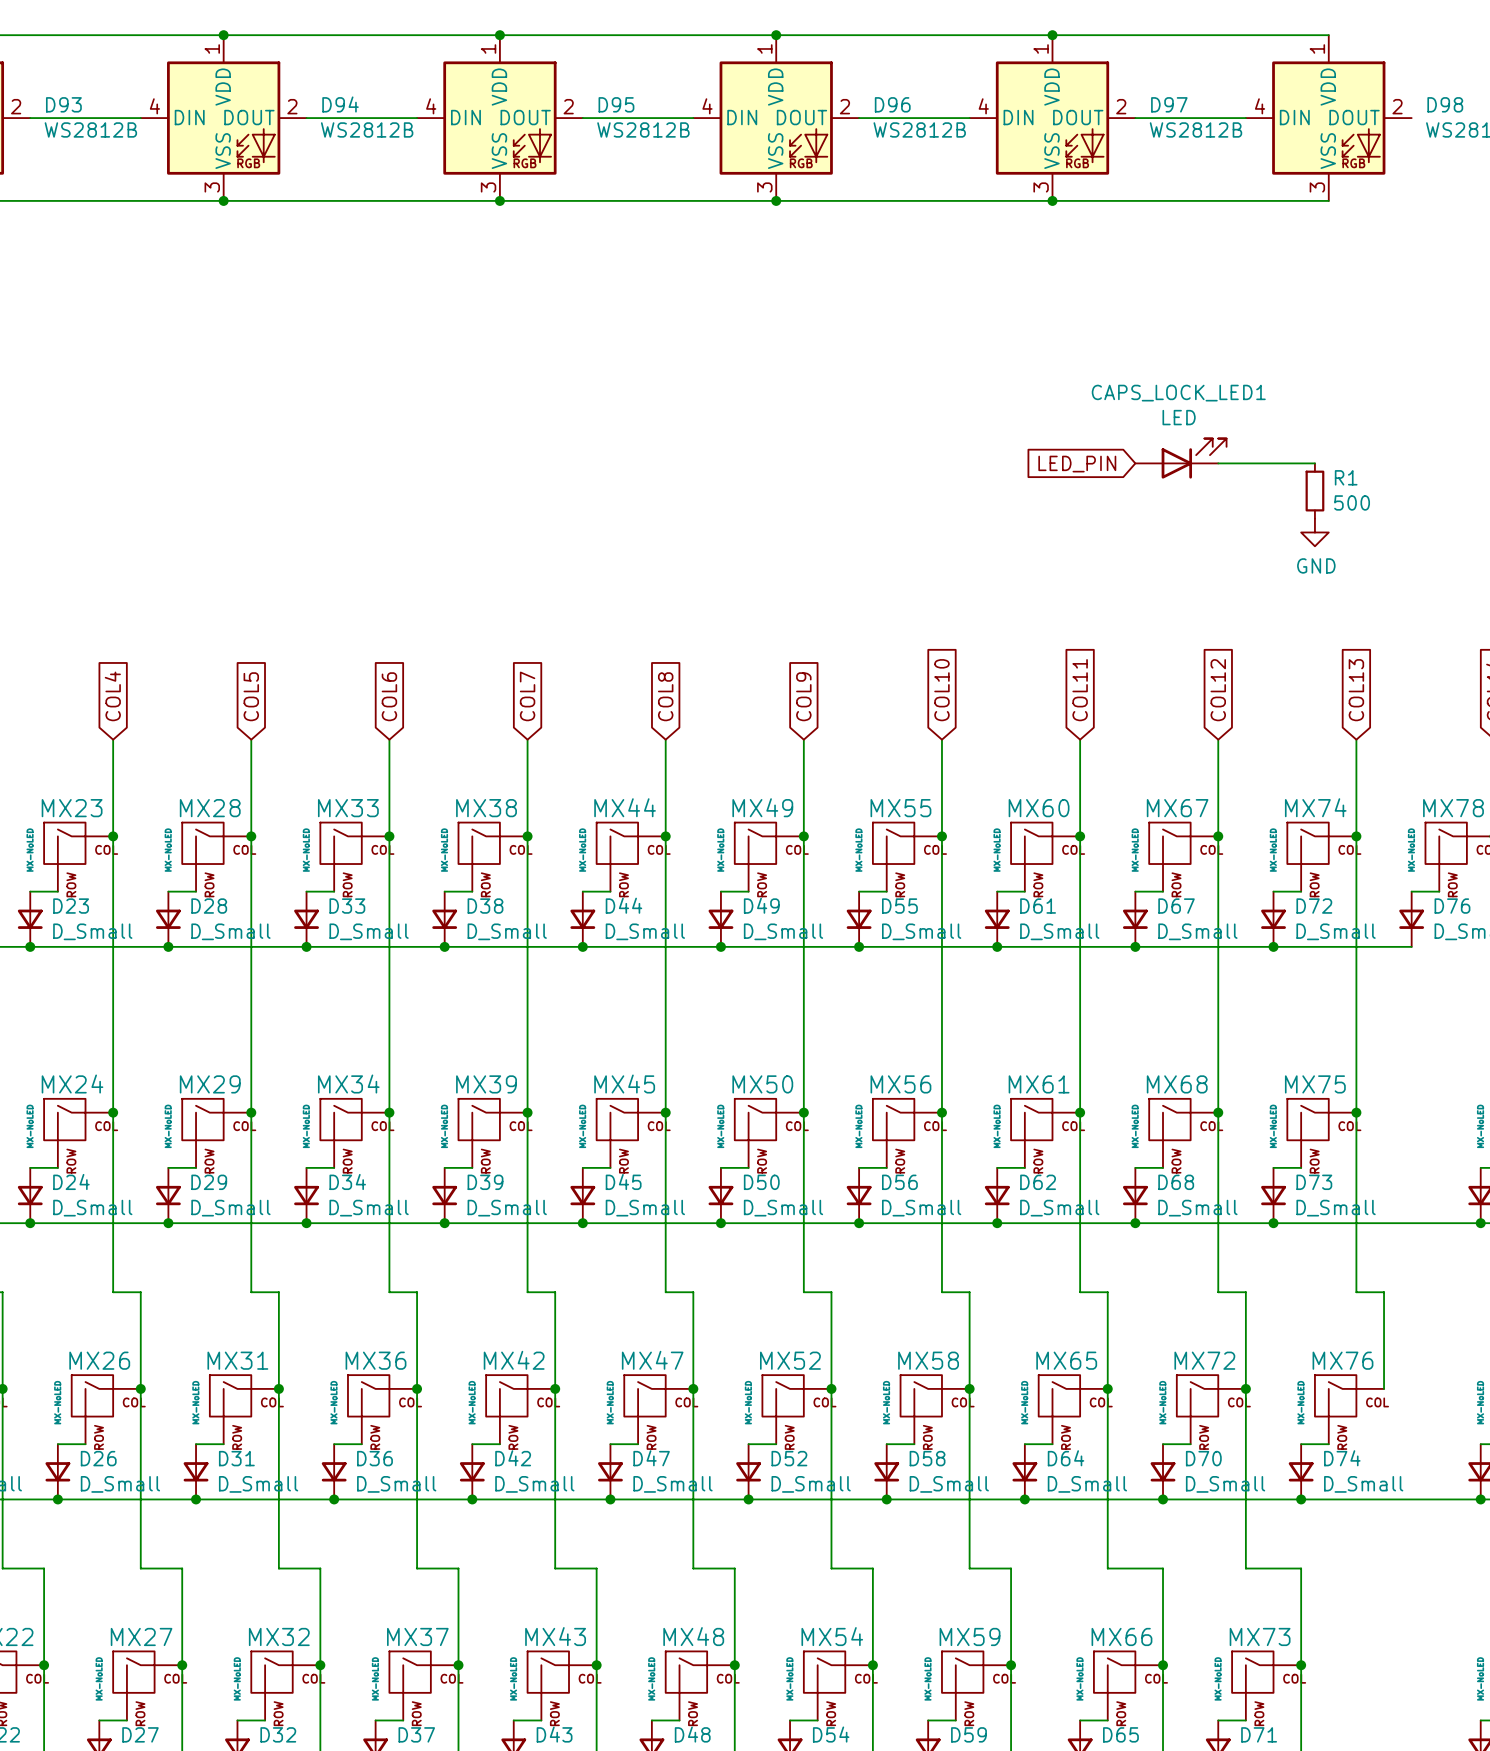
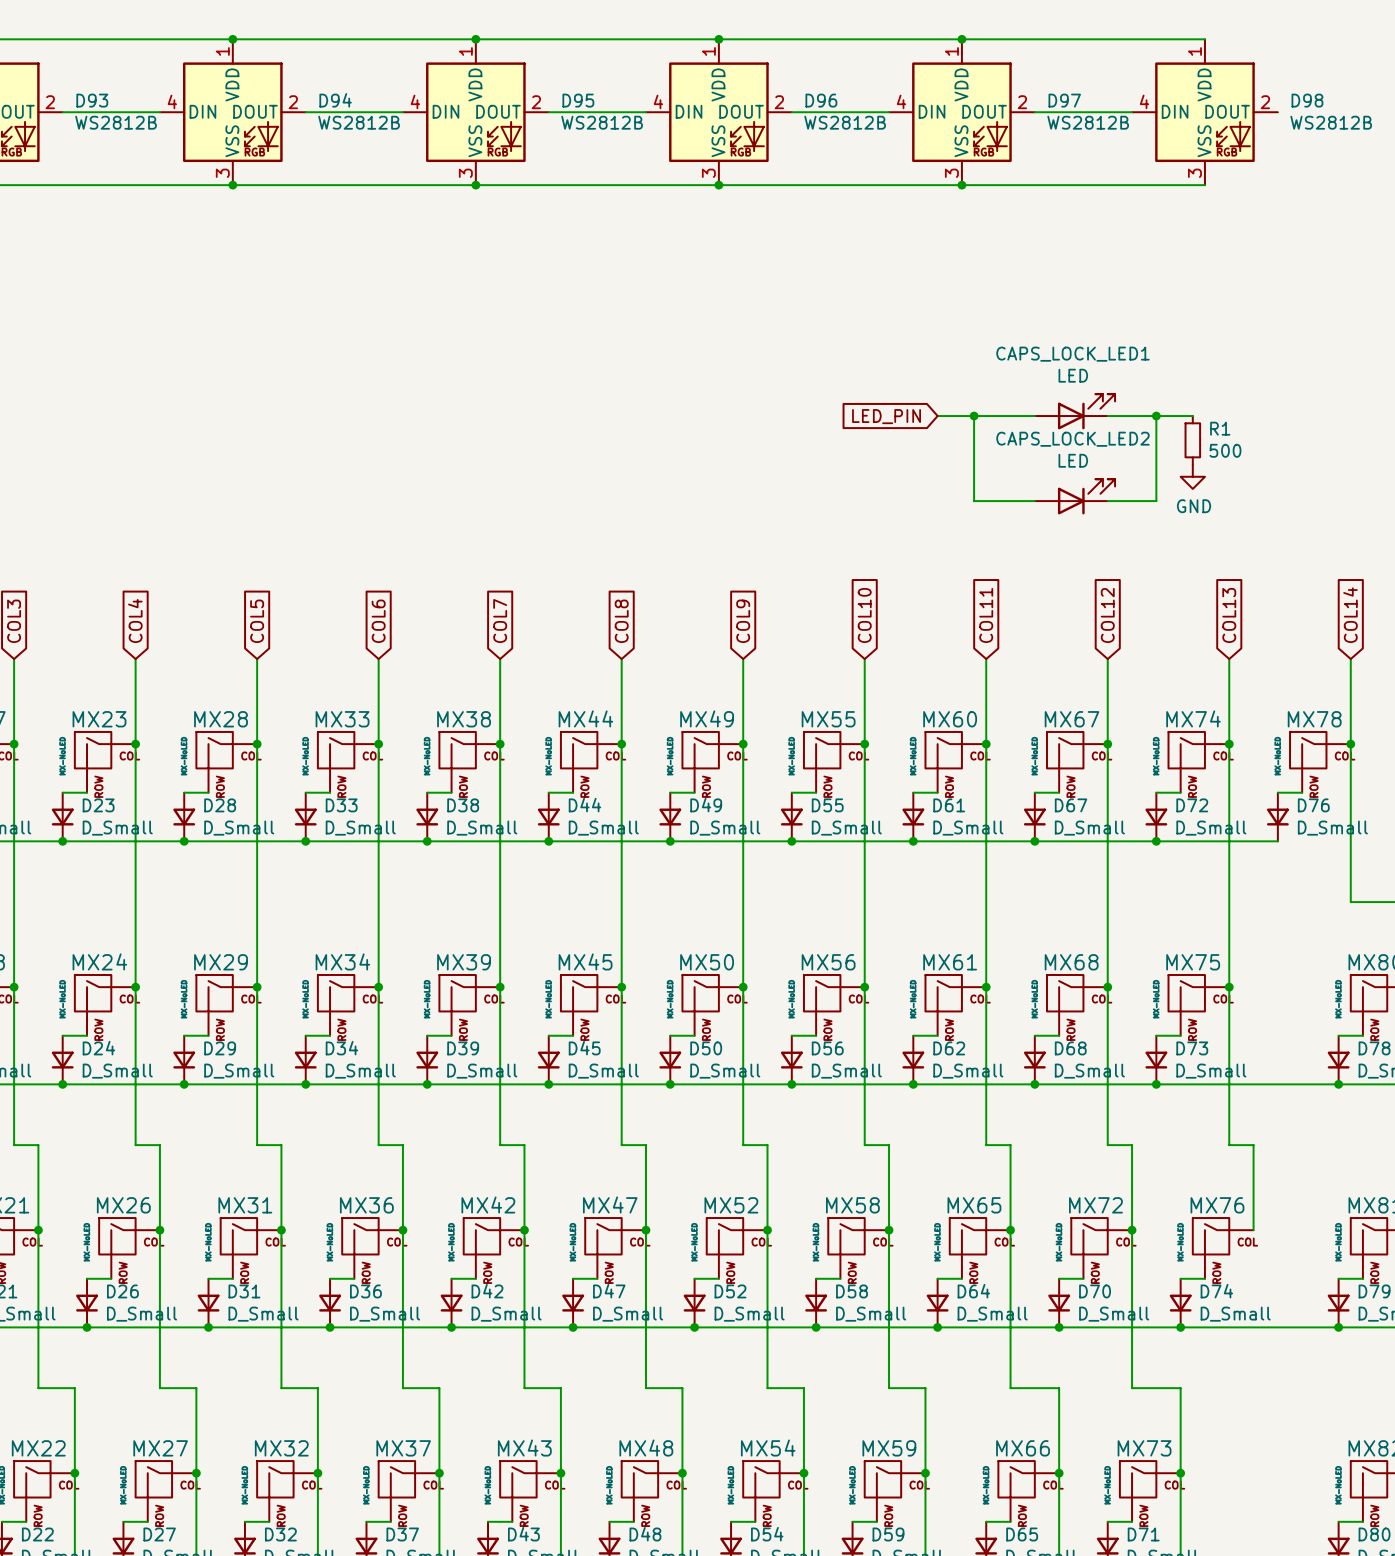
wire: none -> (937, 416) (1034, 416)
wire: none -> (974, 416) (974, 501) (1034, 501)
junction: none -> (974, 416)
wire: none -> (1156, 416) (1156, 501) (1107, 501)
junction: none -> (1156, 416)
global label position: LED_PIN (1077, 464) -> LED_PIN (886, 416)
CAPS_LOCK_LED2: none -> LED (1074, 496)

